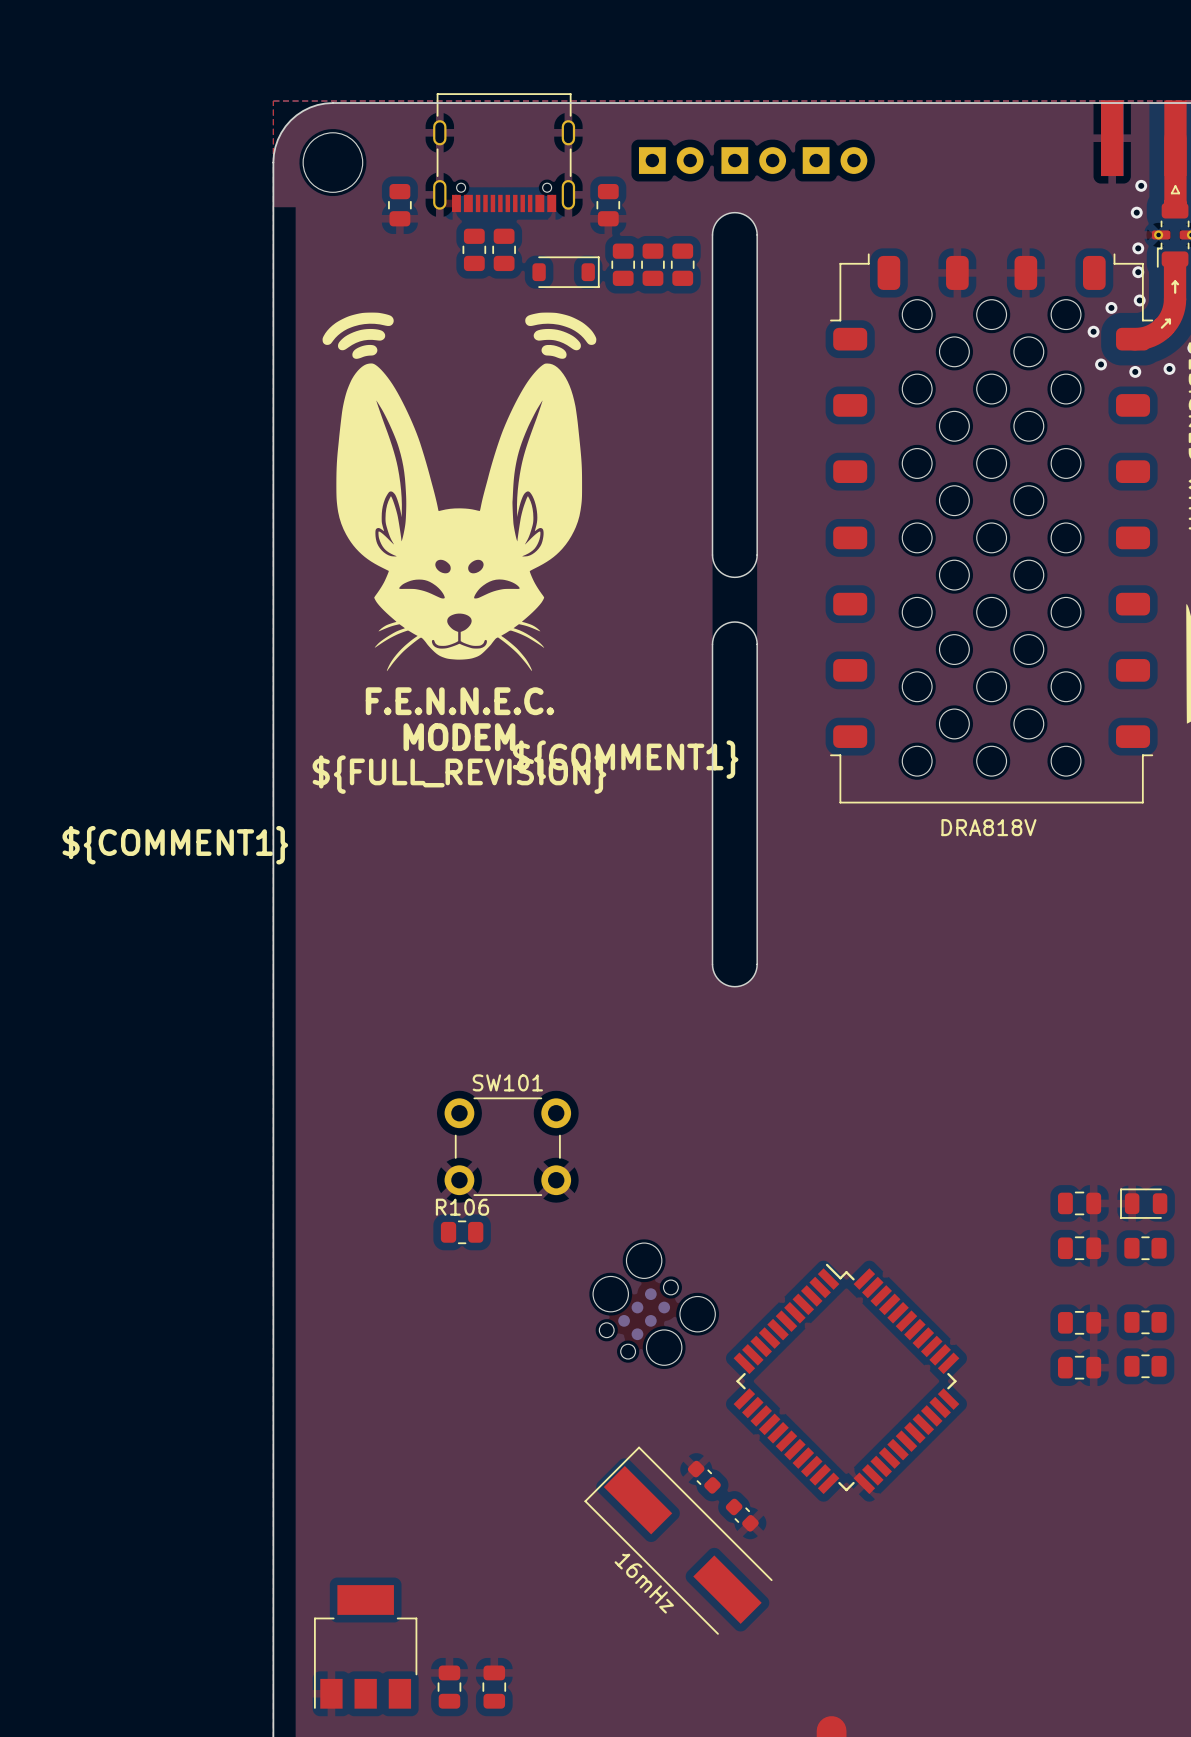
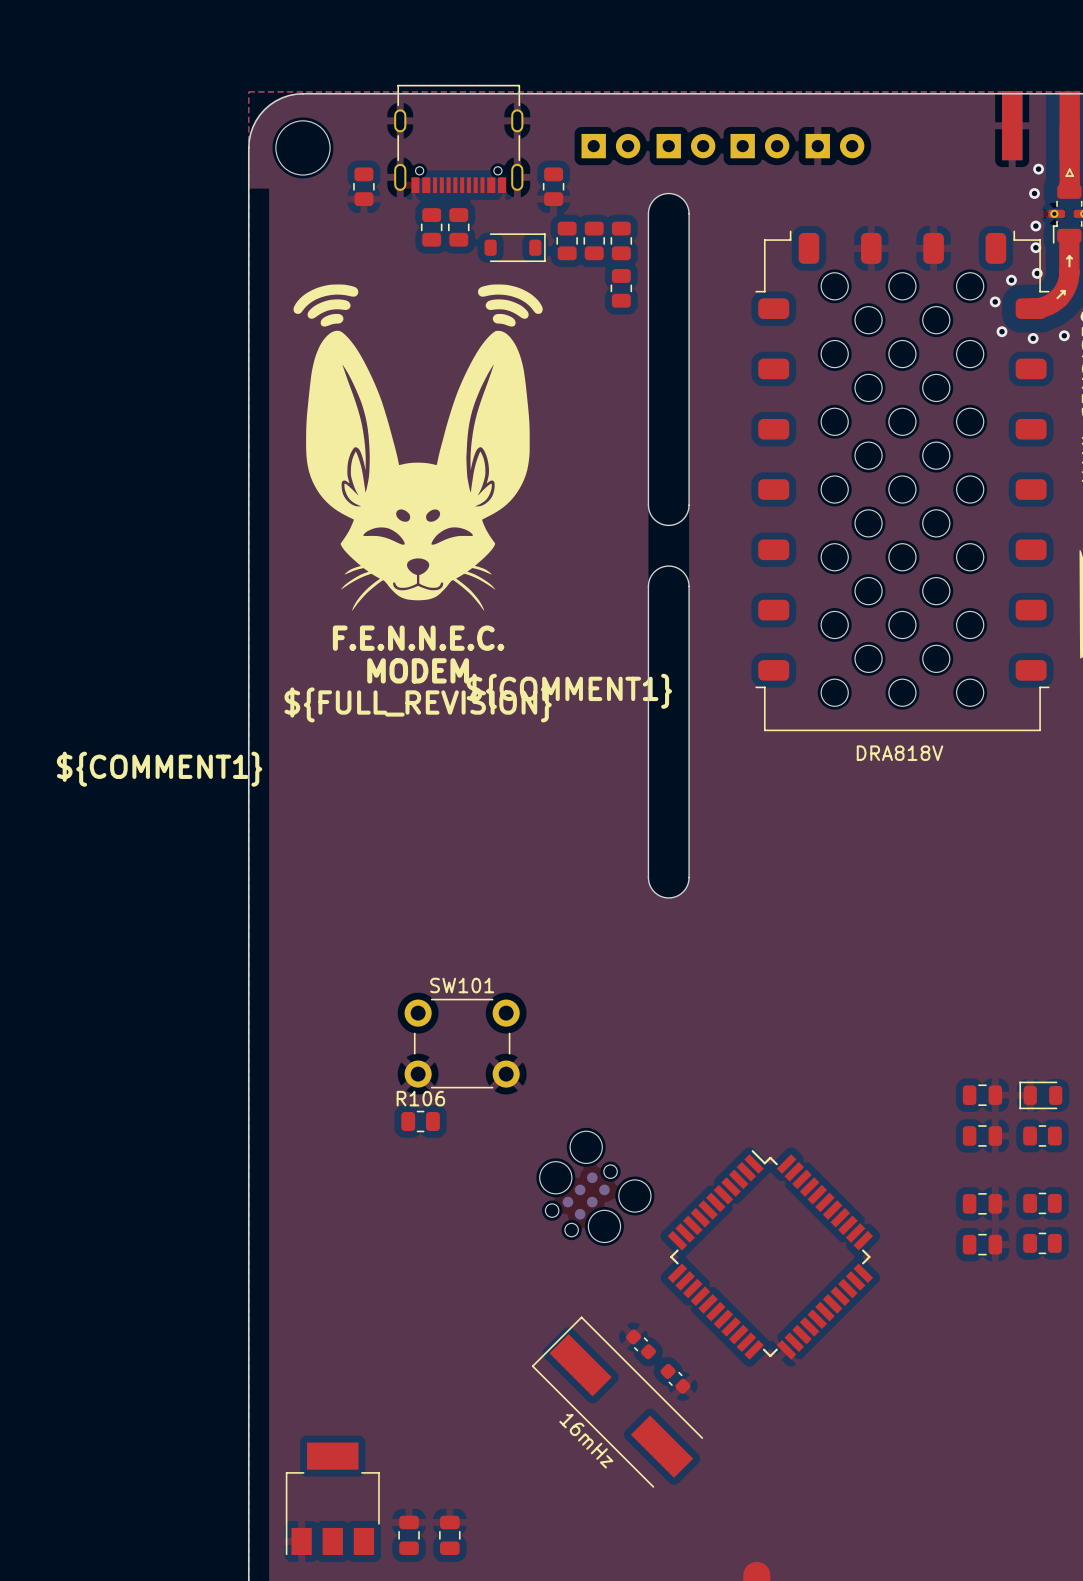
part: none -> (834, 146)
part: none -> (621, 288)

